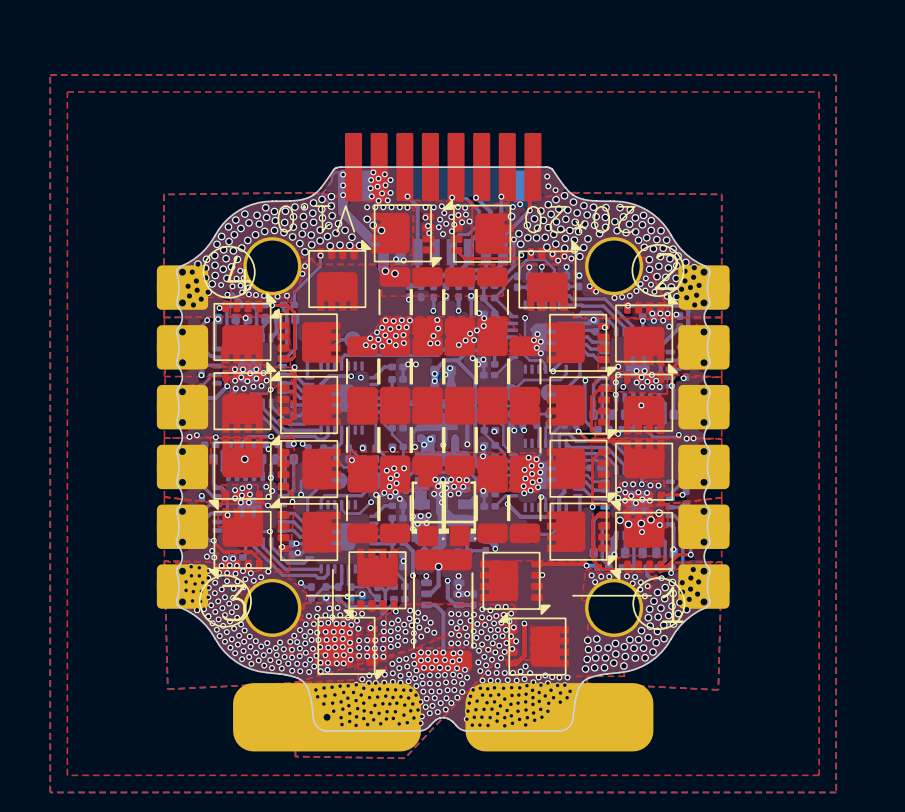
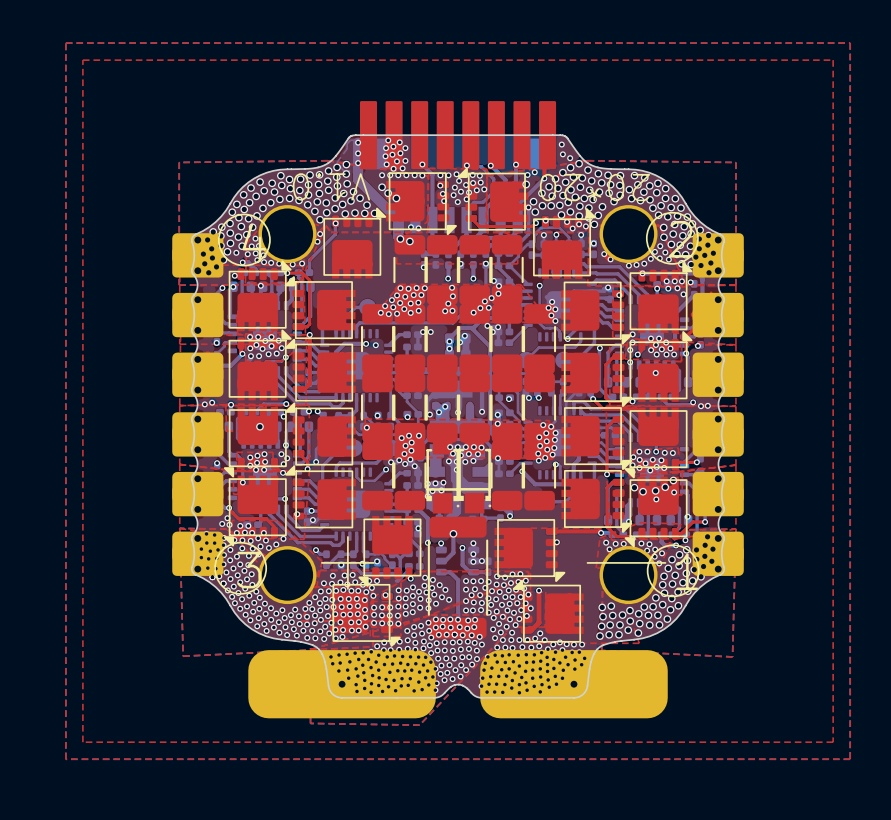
part footprint: [156, 132, 730, 752] -> [172, 101, 744, 719]

